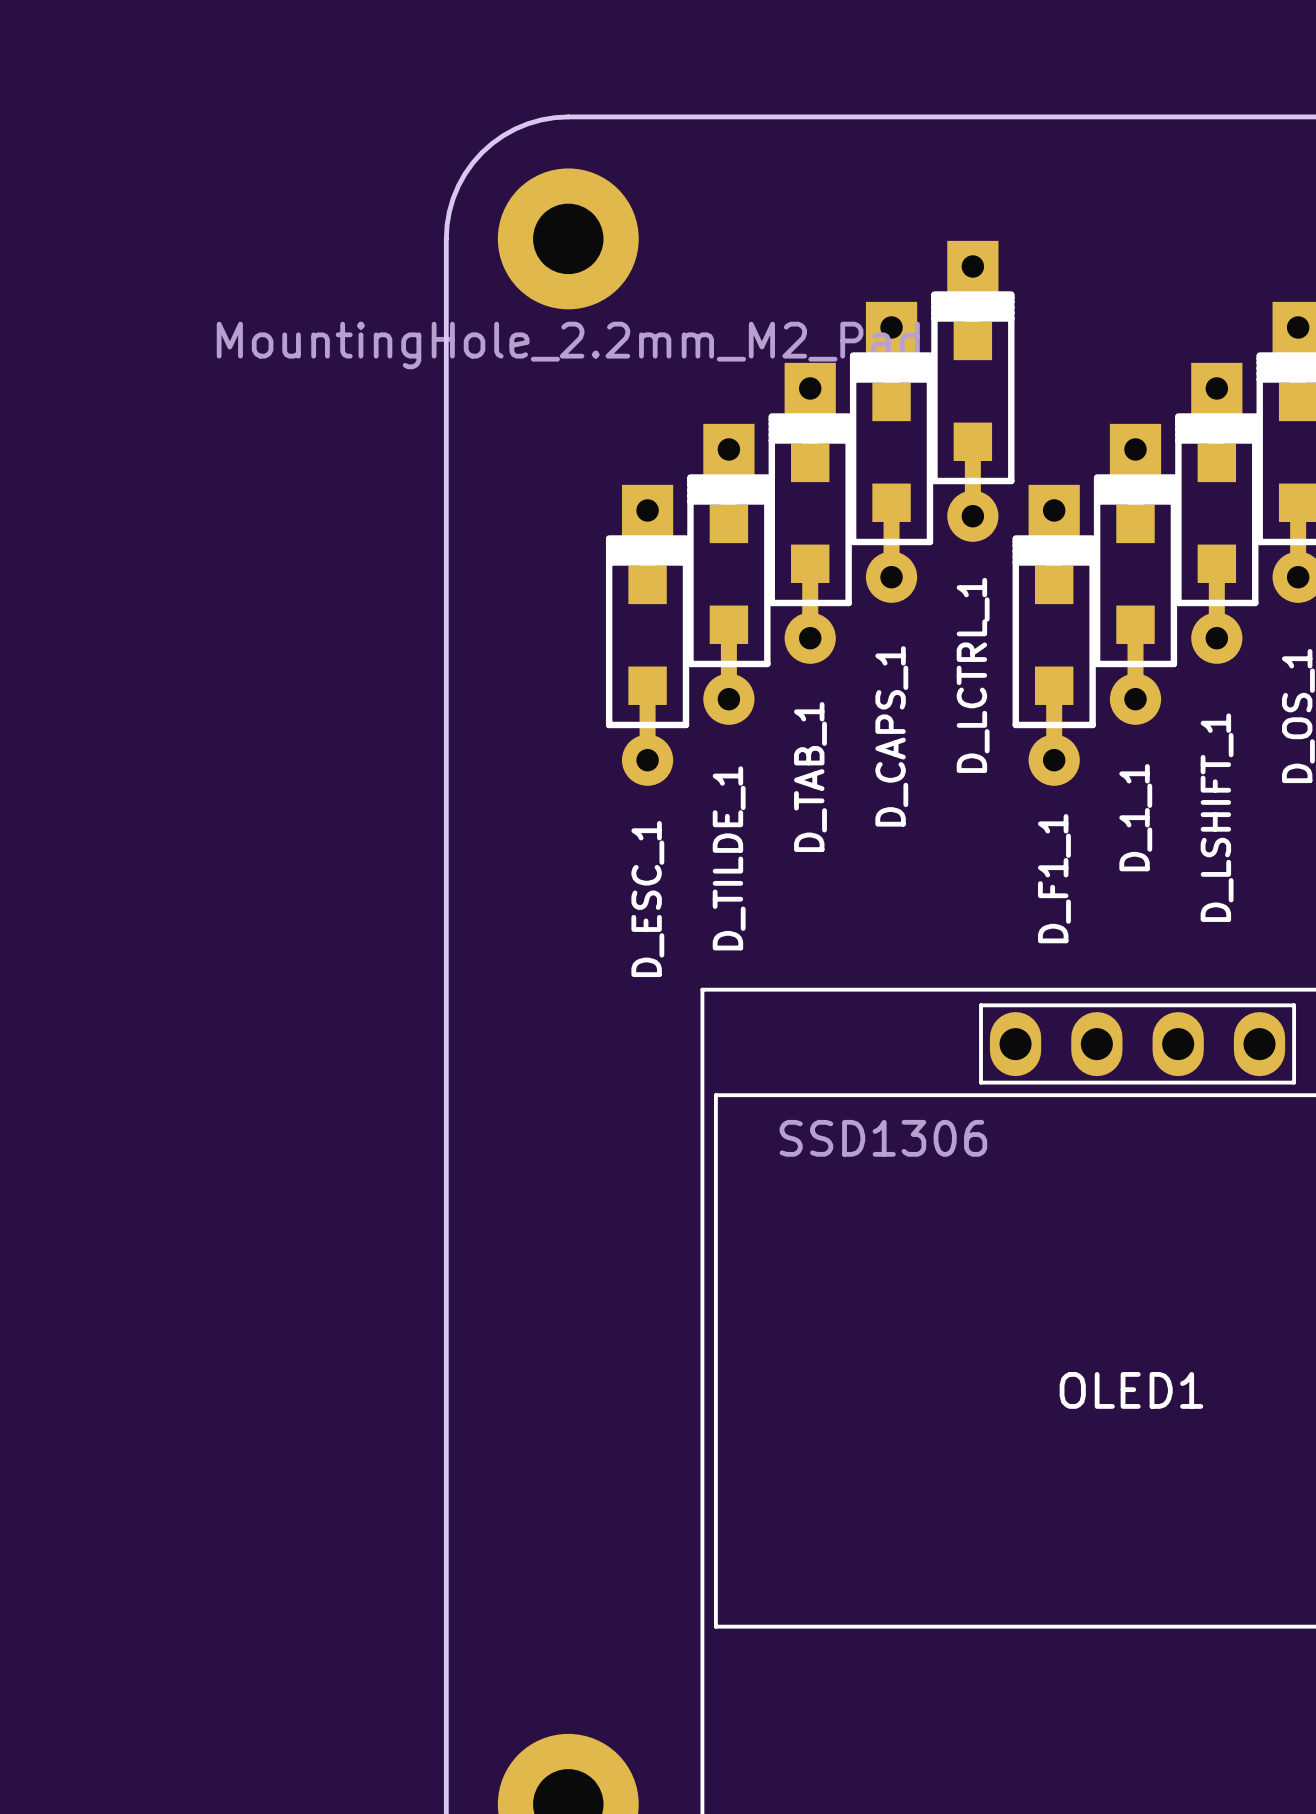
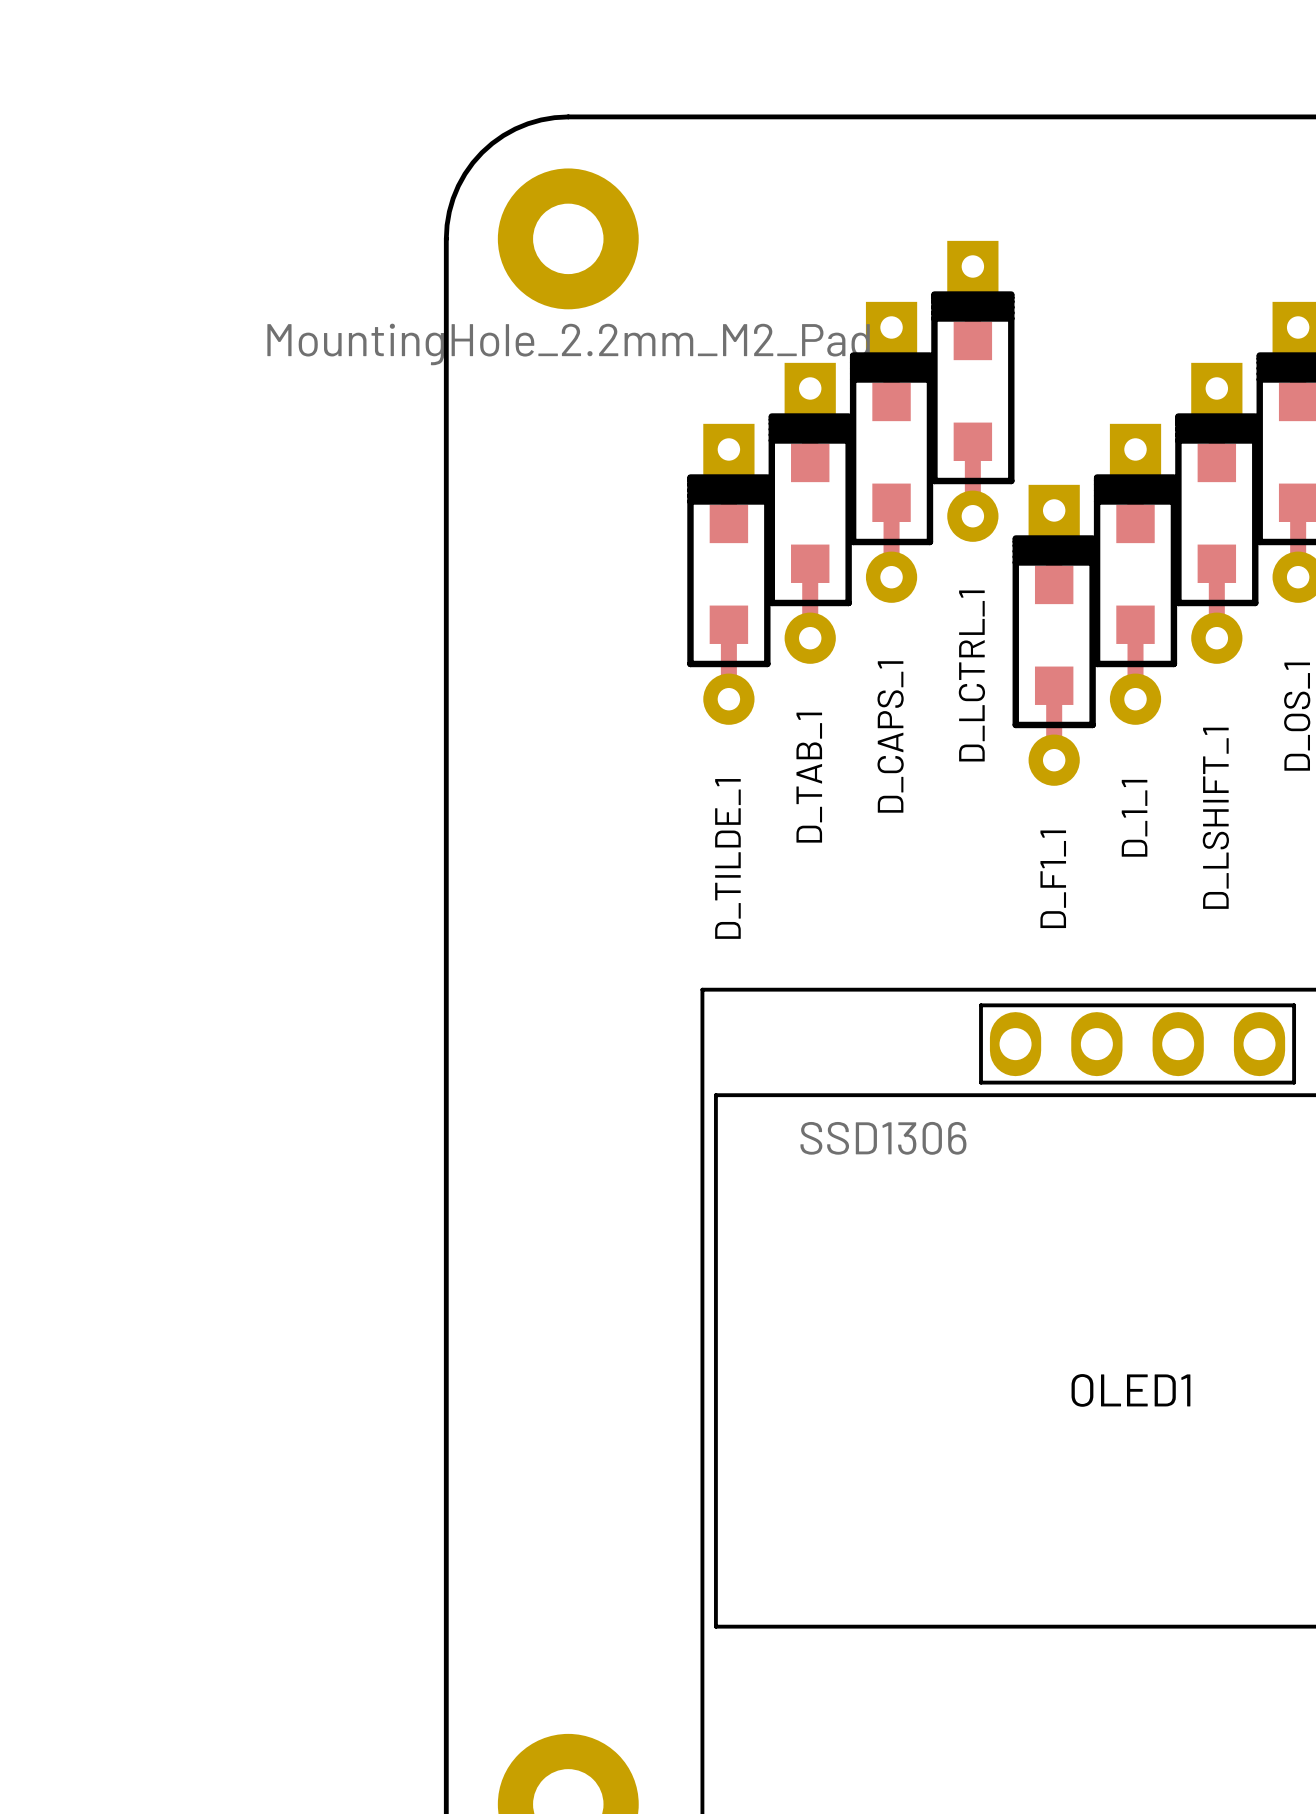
D_ESC_1: (647, 635) -> none

